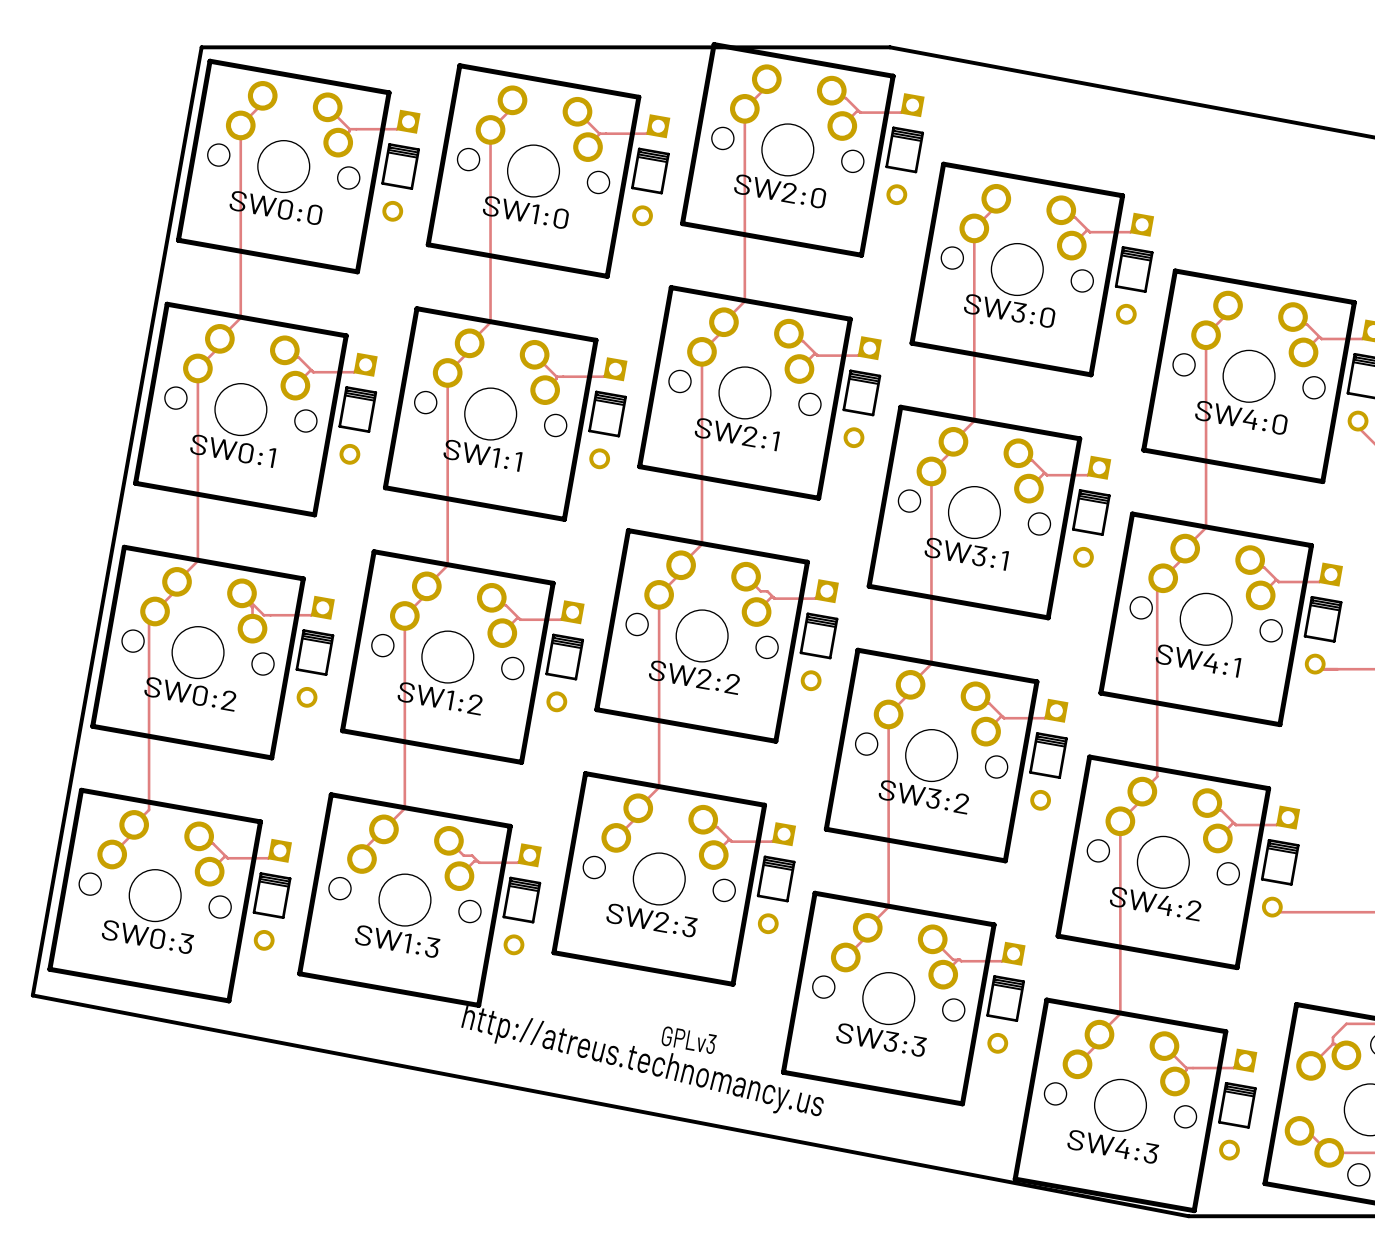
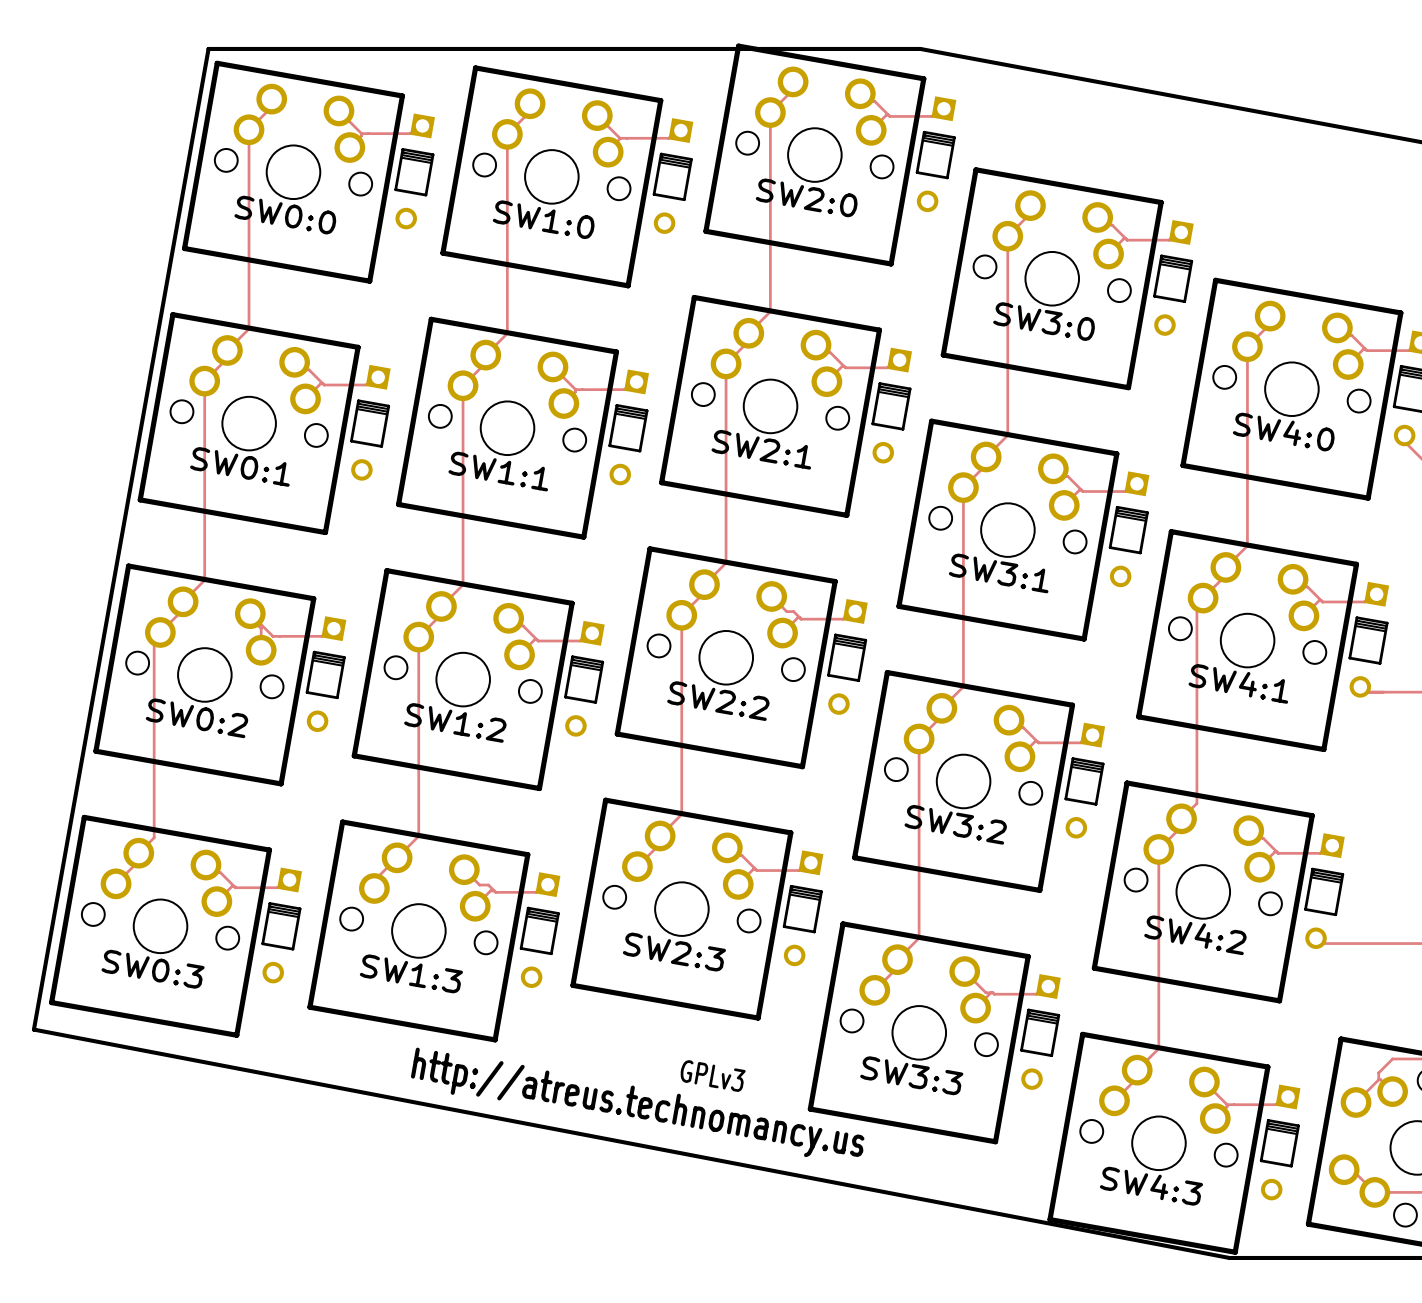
text rotation: 0° (642, 1059) -> 4° counterclockwise (637, 1102)

